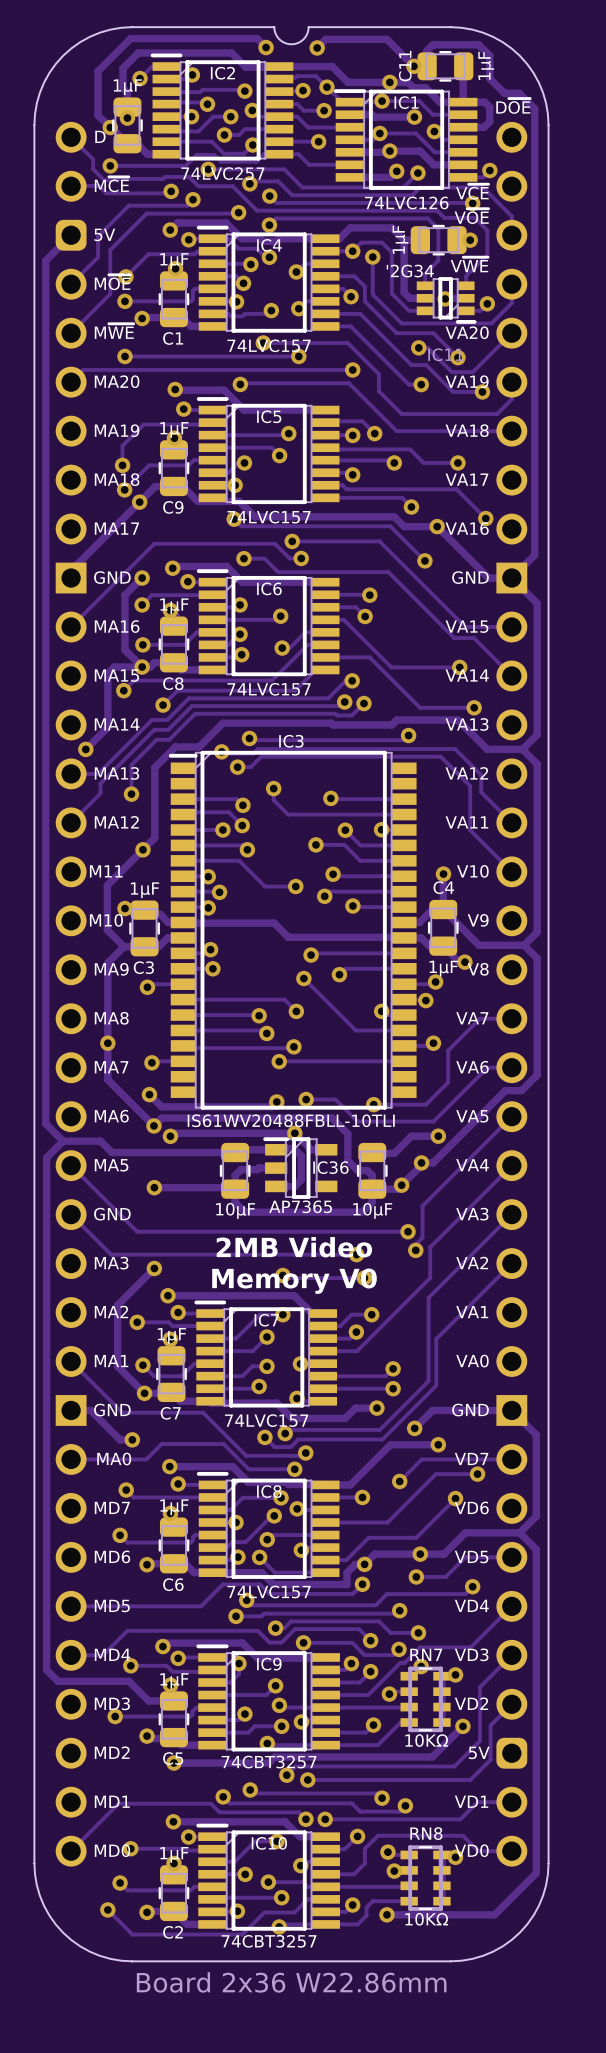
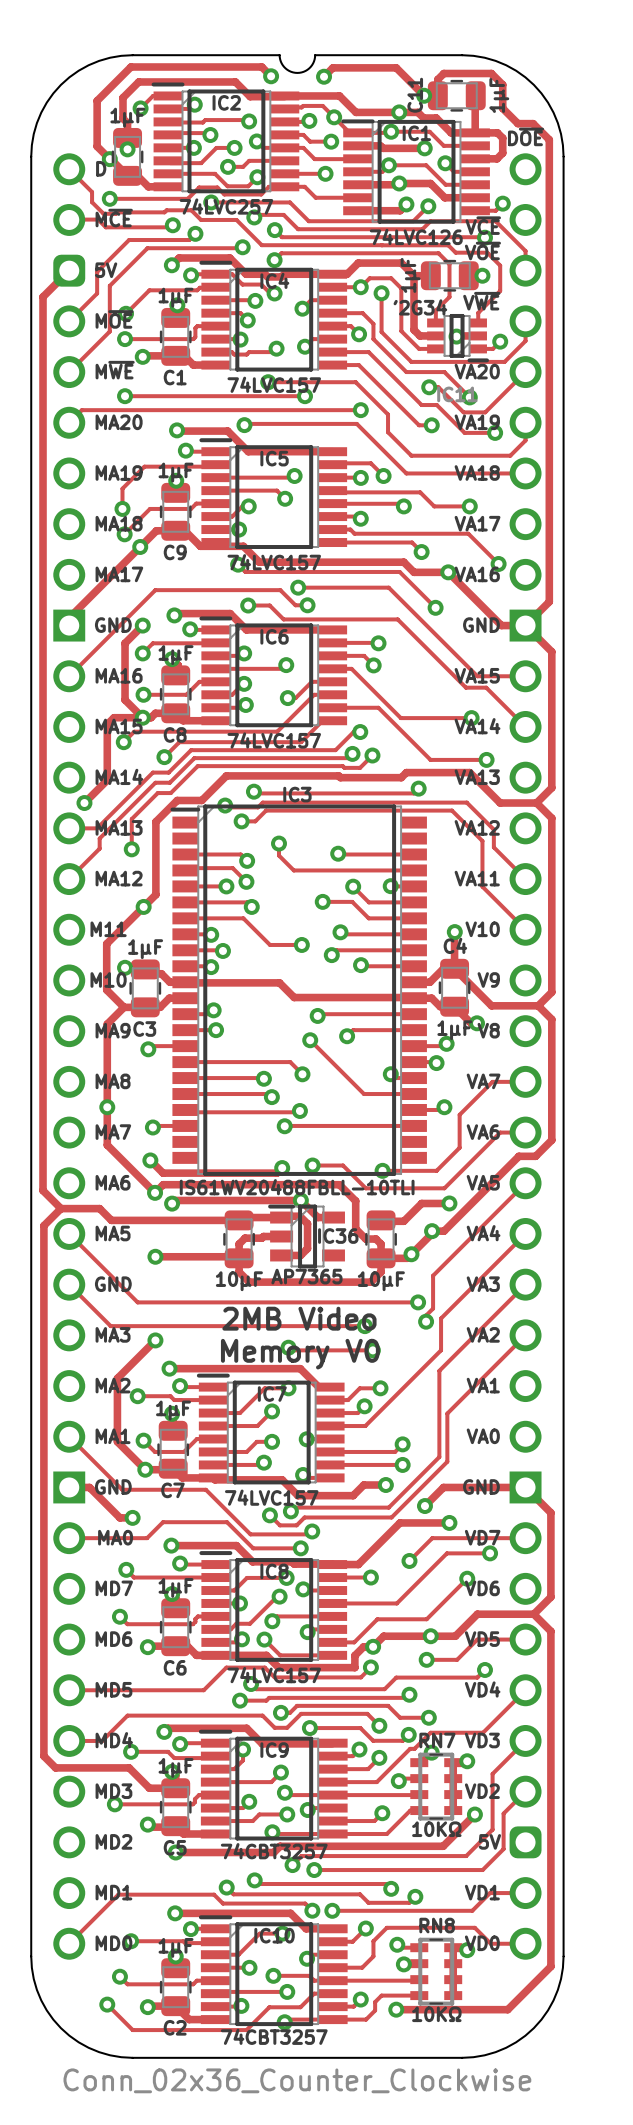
part value: Board 2x36 W22.86mm (291, 1982) -> Conn_02x36_Counter_Clockwise (297, 2080)

